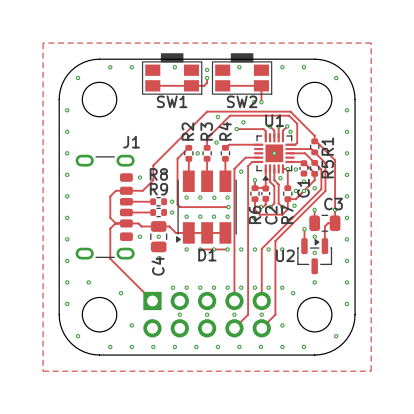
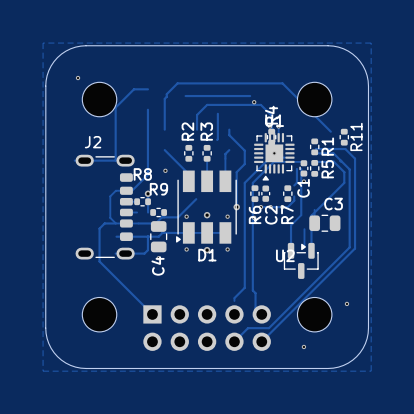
board edge: (99, 59) (314, 59) (330, 62) (346, 74) (351, 84) (355, 99) (355, 314) (349, 334) (339, 346) (325, 353) (314, 355) (99, 355) (84, 351) (67, 339) (60, 325) (59, 314) (59, 94) (64, 79) (74, 67) (89, 60) (99, 59) -> (45, 86) (48, 70) (54, 61) (65, 51) (80, 46) (328, 45) (338, 47) (352, 54) (363, 65) (368, 86) (368, 328) (367, 338) (360, 352) (343, 365) (328, 368) (86, 368) (70, 365) (61, 360) (51, 348) (45, 328) (45, 86)
via: (110, 67) -> none
via: (131, 67) -> none
via: (174, 67) -> none
via: (239, 67) -> none
via: (282, 67) -> none
via: (303, 67) -> none
via: (207, 69) -> none
SW1: (172, 73) -> none
SW2: (242, 73) -> none
track: (207, 78) (207, 82) (204, 85) (152, 85) -> none
via: (207, 78) -> none
via: (336, 78) -> none
track: (222, 85) (261, 85) (261, 101) -> none
track: none -> (147, 89) (133, 89) (115, 107) (115, 160) (74, 160)
track: none -> (185, 96) (250, 96)
via: (261, 102) -> none
via: (67, 110) -> none
via: (346, 110) -> none
track: none -> (217, 113) (217, 139)
via: (217, 117) -> none
via: (243, 122) -> none
track: (287, 126) (282, 130) (282, 137) -> none
via: (287, 126) -> none
track: none -> (164, 129) (164, 98) (177, 83) (282, 83) (330, 131)
track: none -> (197, 129) (197, 115) (207, 104) (260, 104) (271, 115) (271, 131)
track: none -> (229, 129) (229, 135) (244, 150) (244, 164) (236, 172) (236, 207)
track: (236, 129) (263, 129) (265, 131) (265, 137) -> none
via: (236, 129) -> none
via: (67, 131) -> none
via: (290, 131) -> none
via: (346, 131) -> none
R11: none -> (344, 137)
J1 name: J1 (131, 142) -> J2 (93, 142)
via: (216, 142) -> none
track: (258, 144) (229, 144) (225, 147) -> none
track: (289, 144) (297, 142) (297, 123) (289, 115) (230, 115) (207, 138) (207, 147) -> none
track: (188, 147) (177, 158) (177, 204) (180, 207) (228, 207) -> none
track: (289, 149) (311, 149) (325, 163) (325, 190) (301, 215) -> (301, 168) (301, 215)
track: none -> (315, 149) (345, 149) (355, 158) (355, 248) (261, 341)
track: none -> (229, 150) (225, 154) (225, 158)
via: (67, 153) -> none
via: (197, 153) -> none
R4 position: (225, 153) -> (271, 137)
track: (289, 153) (305, 153) (321, 169) (321, 189) (261, 248) (261, 300) -> none
track: none -> (315, 153) (333, 153) (349, 169) (349, 247) (268, 328) (248, 328) (234, 341)
via: (346, 153) -> none
track: (258, 157) (245, 157) (234, 168) (234, 298) -> (284, 157) (270, 157) (244, 182) (244, 287) (234, 298)
track: (188, 158) (188, 174) -> (164, 150) (188, 174)
track: (258, 161) (252, 161) (248, 166) (248, 314) (234, 328) -> none
track: none -> (284, 161) (273, 161) (252, 182) (252, 290) (255, 293) (255, 308) (261, 314)
track: none -> (316, 161) (333, 161) (344, 172) (344, 182) (311, 215) (311, 250)
track: (303, 163) (314, 173) (314, 180) (295, 199) (287, 199) (287, 209) (282, 214) (259, 214) (254, 209) (254, 199) -> none
track: (265, 168) (265, 188) -> none
track: (270, 168) (270, 181) (274, 186) (274, 203) (270, 207) -> none
track: (274, 168) (274, 180) (278, 184) (278, 203) (282, 207) -> none
track: (282, 168) (287, 168) (287, 188) -> none
via: (287, 168) -> none
track: none -> (296, 168) (296, 182) (294, 185)
via: (295, 169) -> none
via: (241, 171) -> none
via: (67, 174) -> none
via: (346, 174) -> none
via: (139, 177) -> none
via: (280, 178) -> none
track: (254, 180) (254, 188) (265, 188) -> none
via: (254, 180) -> none
via: (314, 188) -> none
track: (132, 190) (142, 190) (153, 180) (153, 165) (207, 111) (290, 111) (314, 135) (313, 141) (316, 141) (335, 160) (335, 223) (328, 223) (324, 226) (324, 246) -> (132, 190) (147, 174) (147, 109)
via: (295, 190) -> none
via: (303, 190) -> none
track: none -> (148, 193) (148, 212)
via: none -> (148, 193)
via: (67, 196) -> none
via: (346, 196) -> none
via: (186, 197) -> none
via: (200, 197) -> none
via: (214, 197) -> none
via: (227, 197) -> none
track: (265, 198) (265, 204) (263, 207) -> (294, 196) (294, 200) (287, 207) (263, 207)
track: none -> (196, 199) (178, 217) (161, 217) (155, 223) (138, 223)
track: (137, 201) (153, 201) -> none
R8 position: (158, 201) -> (142, 201)
via: (172, 201) -> none
via: (294, 205) -> none
via: (228, 207) -> none
via: none -> (236, 207)
via: (314, 209) -> none
via: (335, 209) -> none
track: (137, 212) (153, 212) -> none
via: (172, 212) -> none
via: none -> (207, 215)
via: (200, 216) -> none
via: (213, 216) -> none
via: (67, 217) -> none
via: (346, 217) -> none
track: (115, 223) (110, 228) (110, 258) (152, 300) -> (115, 223) (104, 223) (99, 228) (99, 261) (152, 314)
track: (138, 223) (141, 226) (169, 226) (175, 232) -> (116, 236) (158, 236) (162, 232) (175, 232)
track: (291, 225) (275, 241) (275, 314) (261, 328) -> (291, 225) (291, 250)
via: (304, 229) -> none
via: (139, 236) -> none
track: none -> (147, 236) (147, 250) (144, 253) (115, 253)
via: (158, 236) -> none
via: (314, 236) -> none
via: (67, 239) -> none
via: (346, 239) -> none
track: (200, 249) (227, 249) -> none
via: (200, 249) -> none
via: (213, 249) -> none
via: (241, 249) -> none
via: (254, 249) -> none
via: (268, 249) -> none
via: (282, 249) -> none
via: none -> (207, 250)
via: (314, 252) -> none
U2 position: (314, 256) -> (301, 260)
via: (67, 260) -> none
via: (346, 260) -> none
via: (67, 282) -> none
via: (88, 282) -> none
via: (314, 282) -> none
via: (346, 282) -> none
via: (172, 287) -> none
via: (186, 287) -> none
via: (200, 287) -> none
via: (213, 287) -> none
via: (227, 287) -> none
via: (241, 287) -> none
via: (254, 287) -> none
via: (268, 287) -> none
via: (282, 287) -> none
via: (121, 293) -> none
via: (293, 293) -> none
via: (67, 303) -> none
via: (179, 314) -> none
part position: (207, 314) -> (207, 328)
via: (207, 314) -> none
via: (234, 314) -> none
via: (261, 314) -> none
via: (131, 325) -> none
via: (282, 325) -> none
via: (78, 336) -> none
via: (336, 336) -> none
via: (110, 346) -> none
via: (131, 346) -> none
via: (153, 346) -> none
via: (174, 346) -> none
via: (196, 346) -> none
via: (217, 346) -> none
via: (239, 346) -> none
via: (260, 346) -> none
via: (282, 346) -> none

